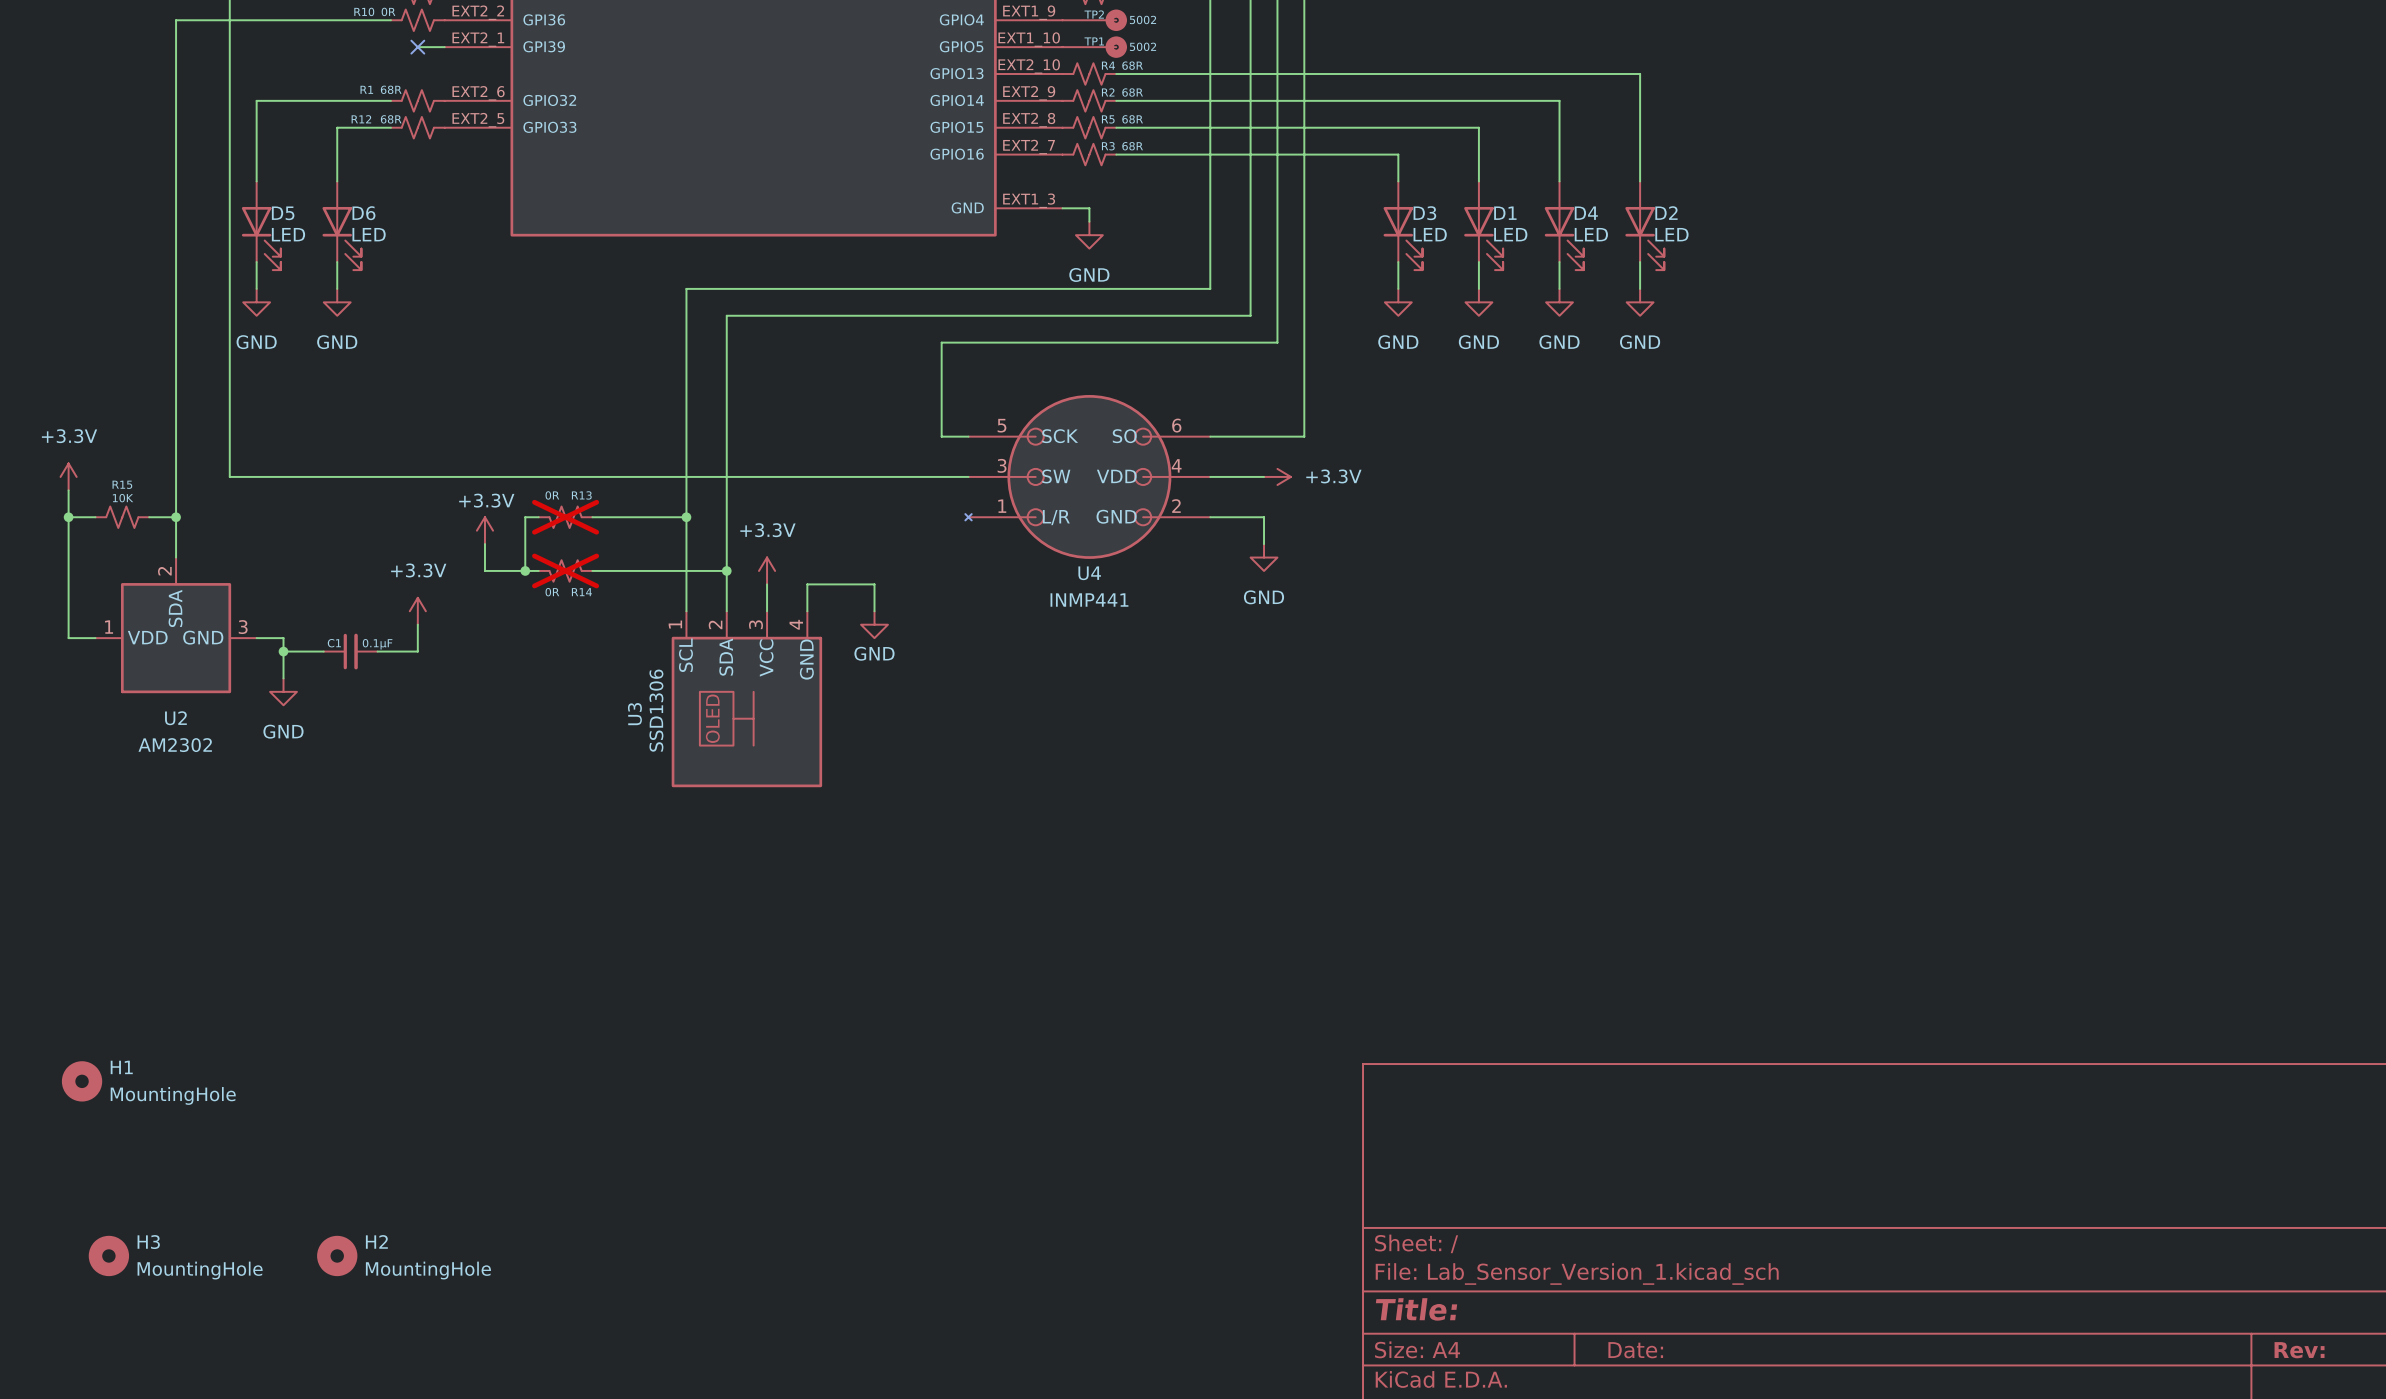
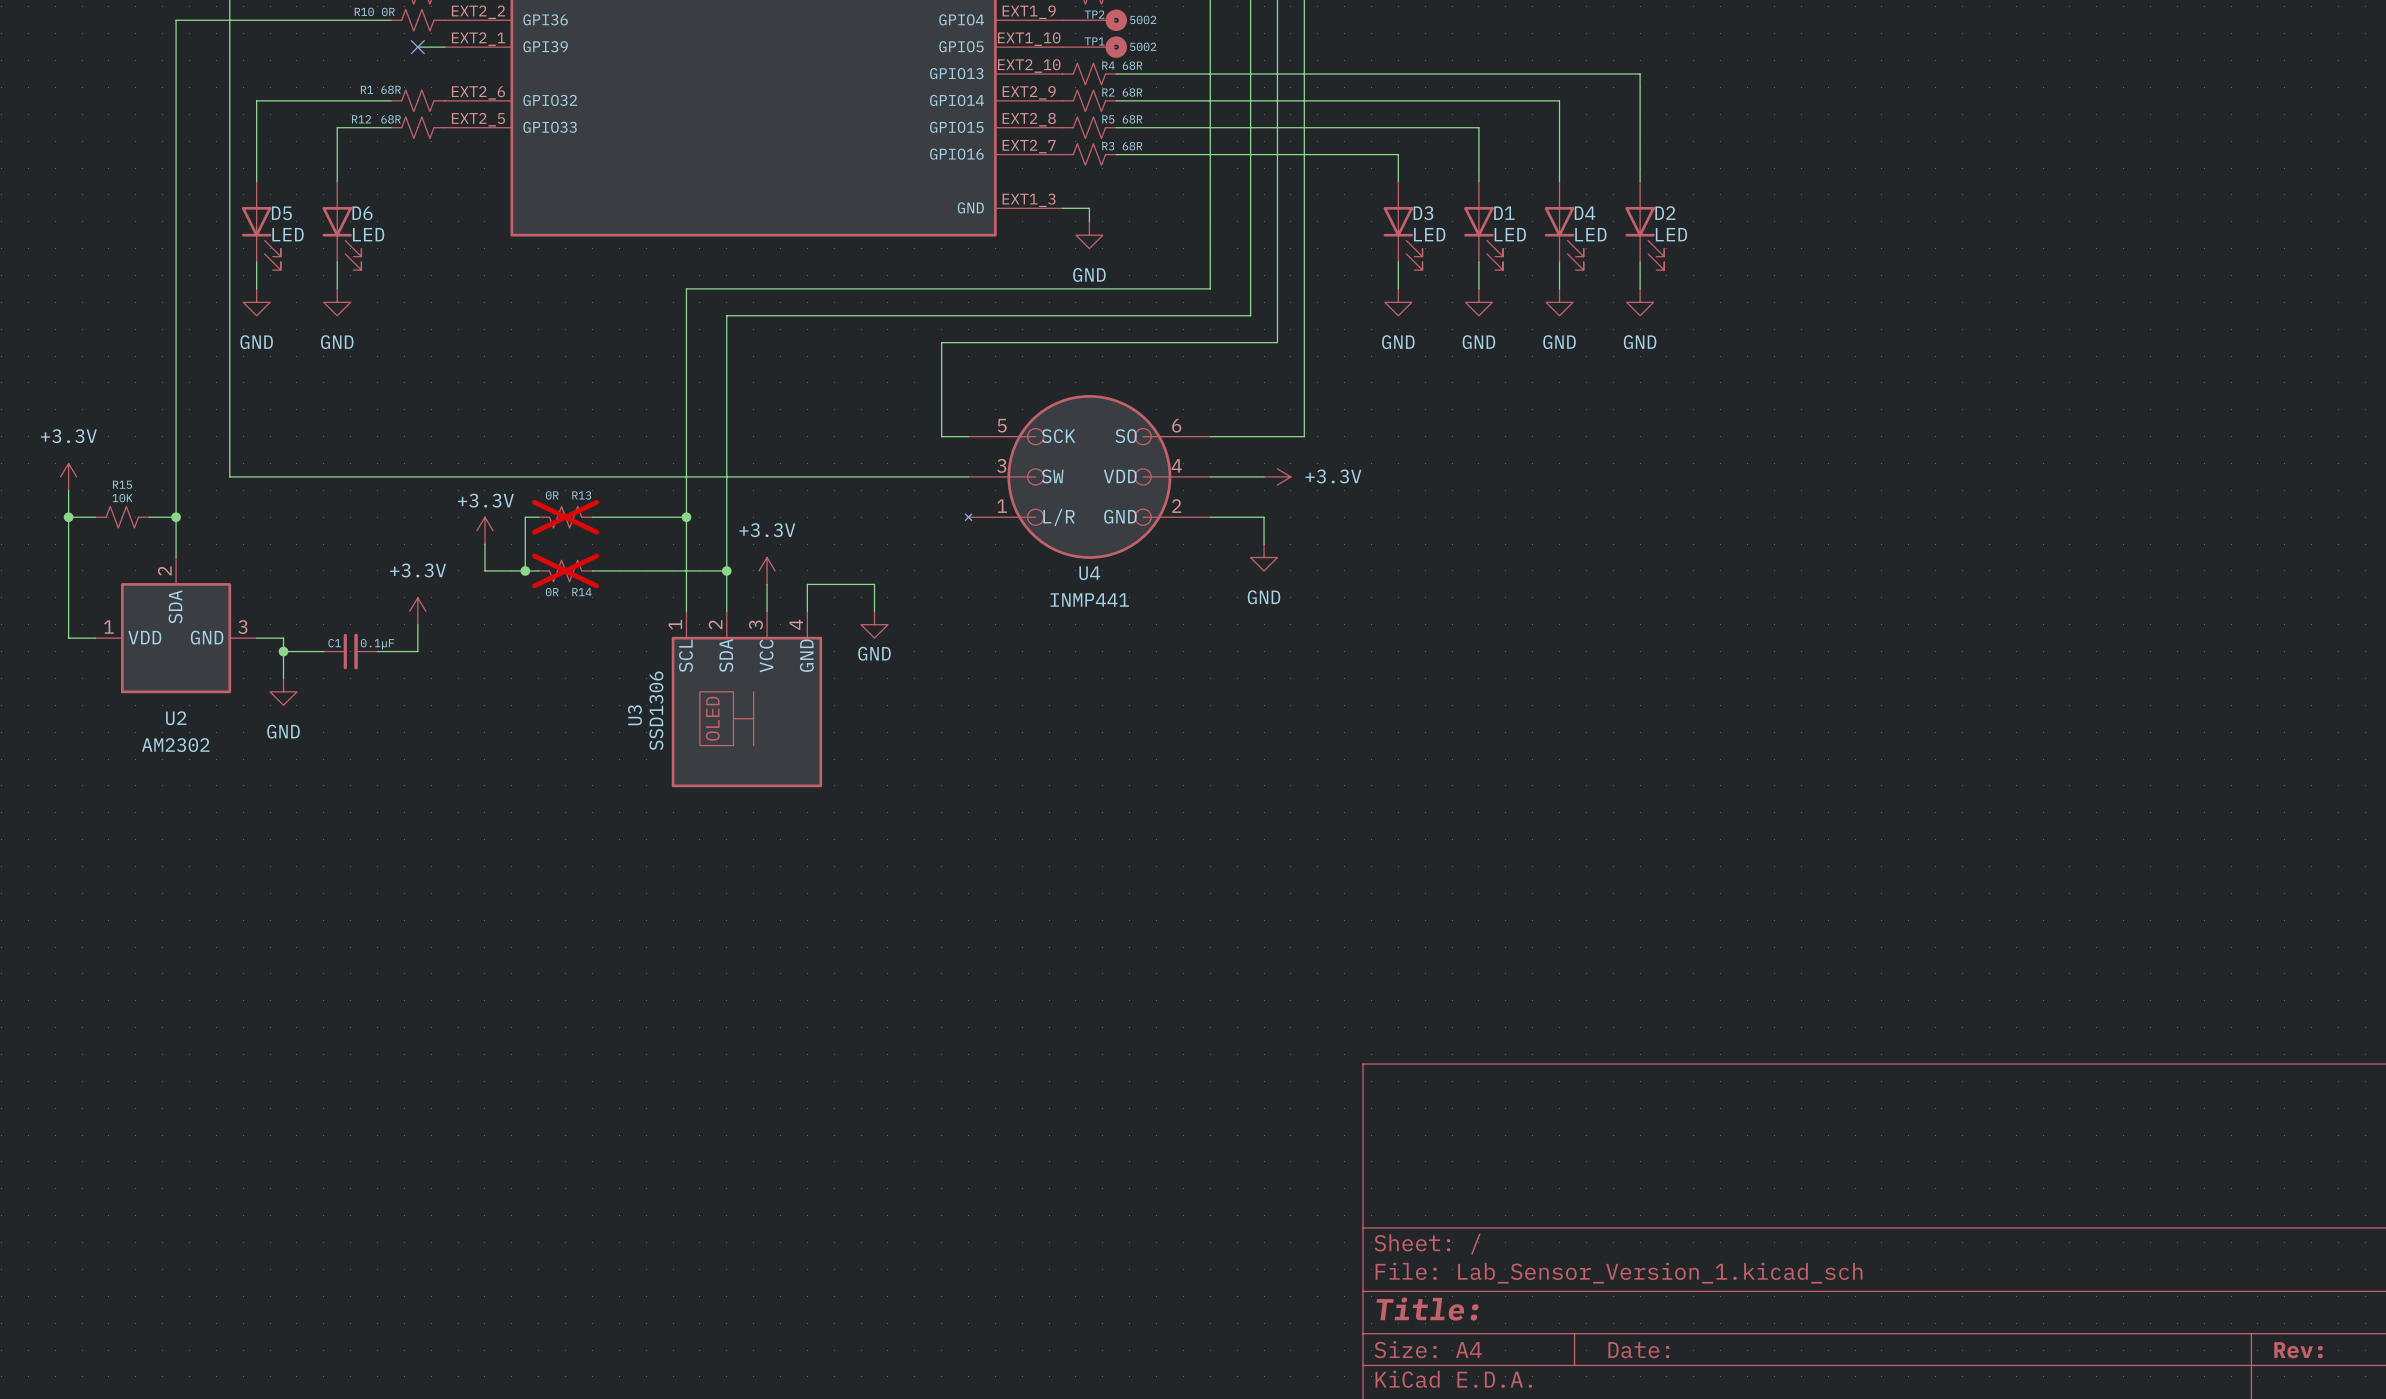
H1: MountingHole (82, 1081) -> none
H3: MountingHole (108, 1255) -> none
H2: MountingHole (337, 1255) -> none

